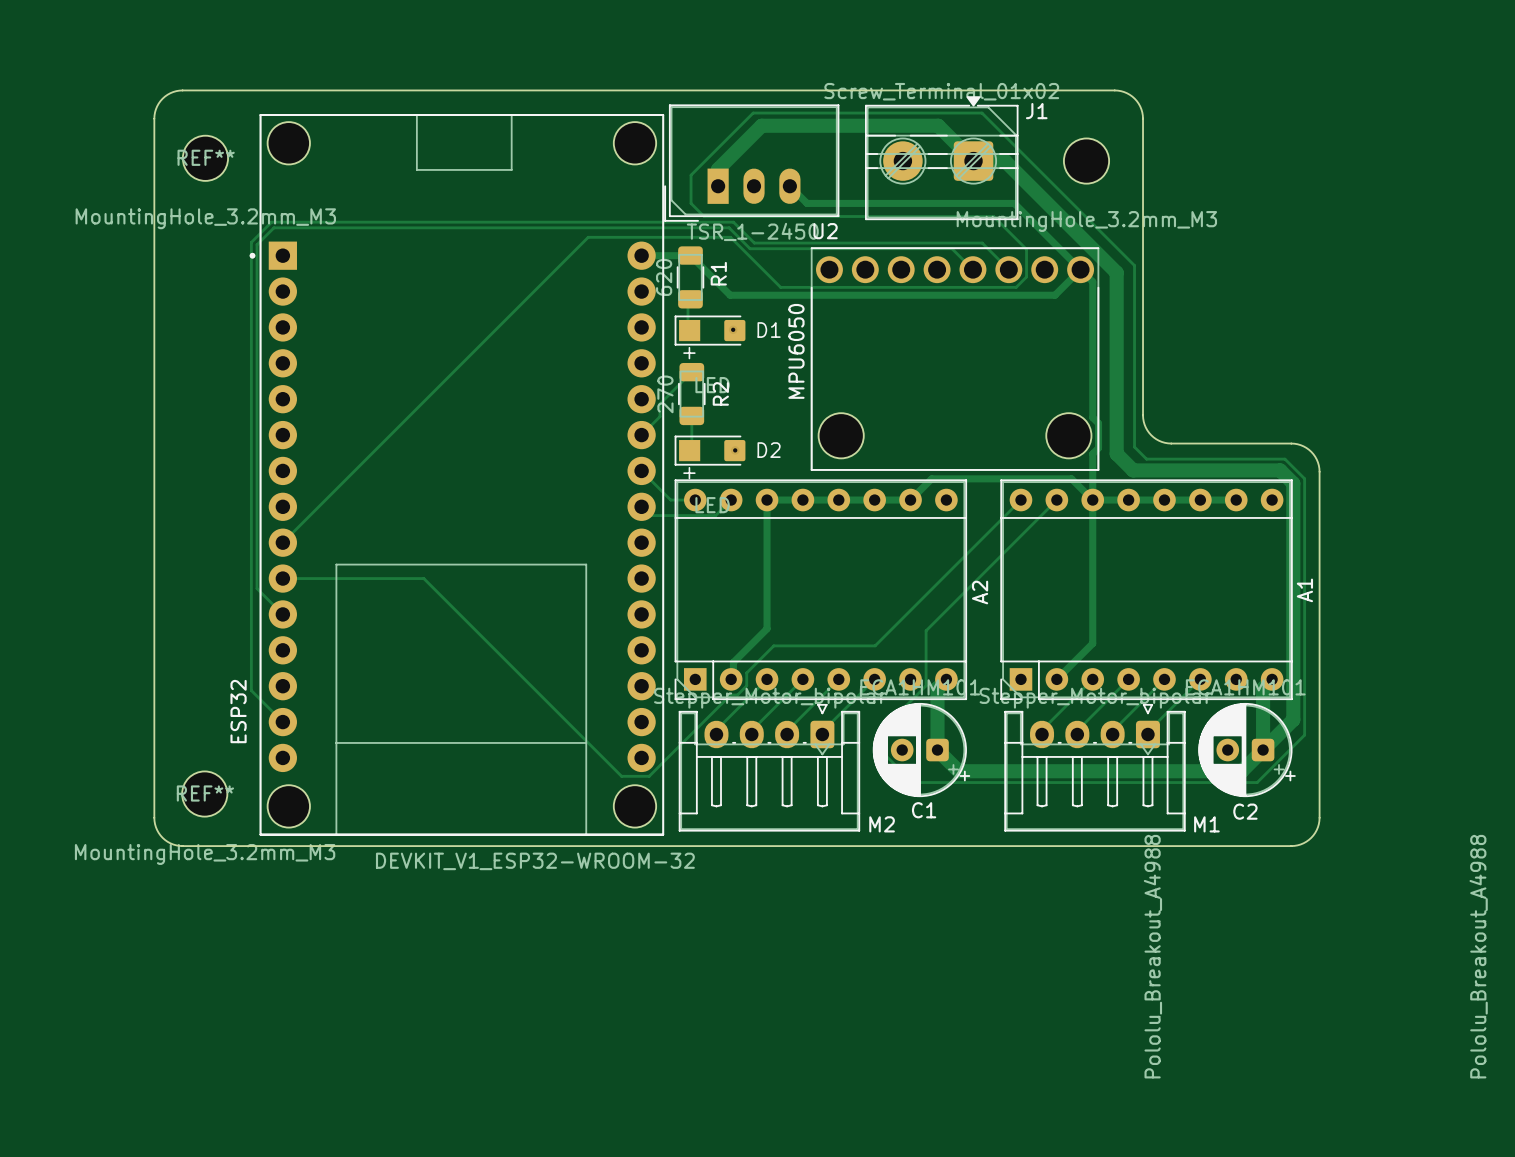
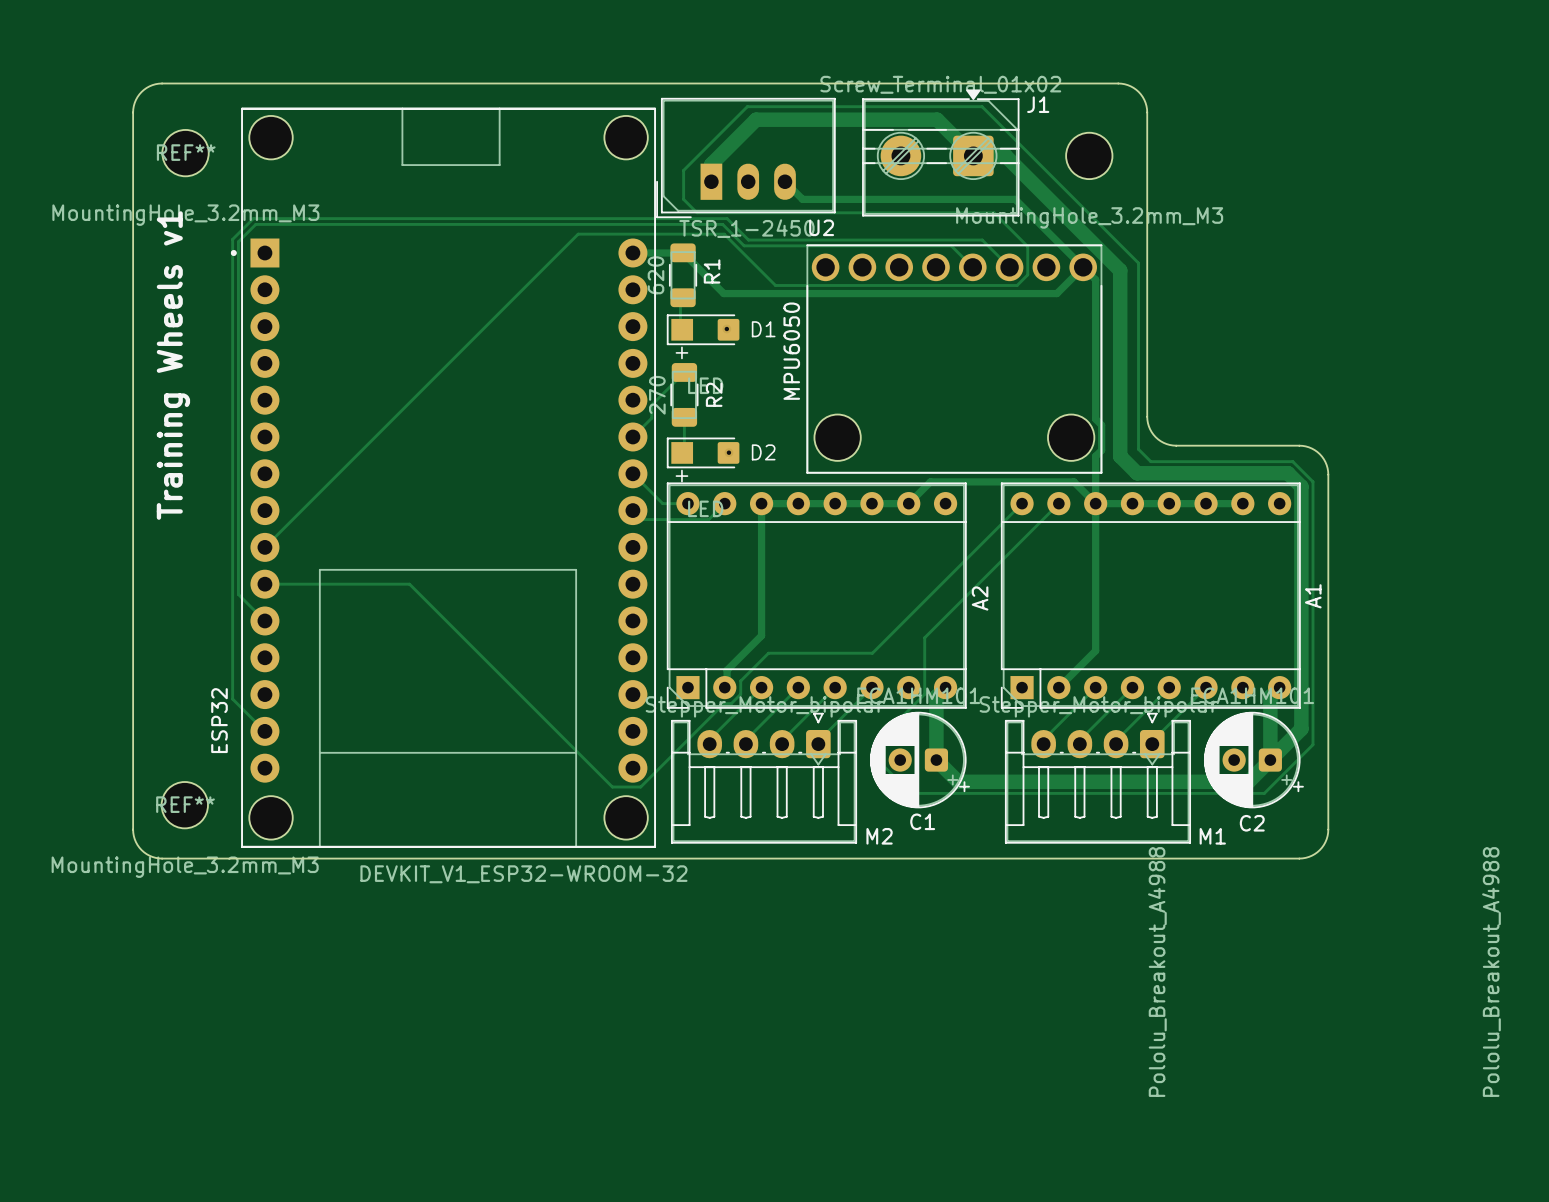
text: none -> Training Wheels v1 (173, 365)

